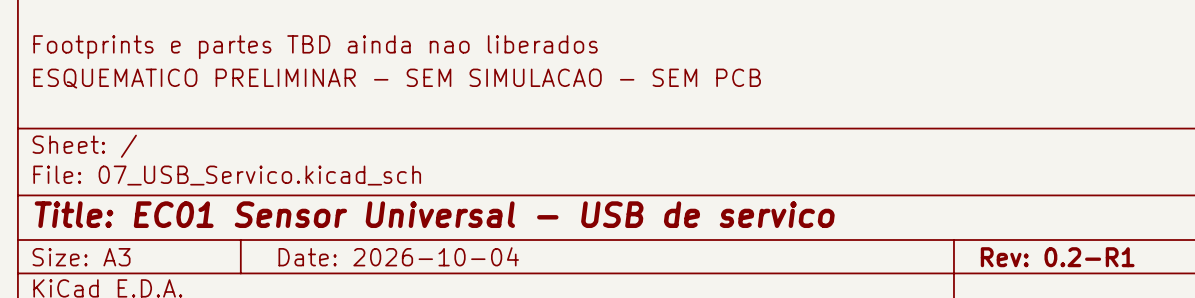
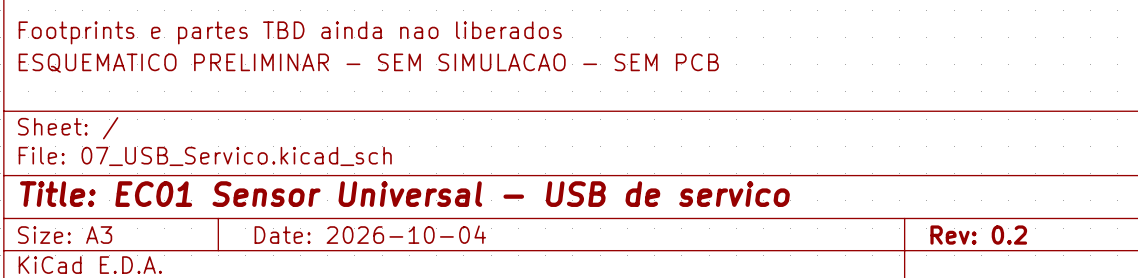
title block: Rev: 0.2-R1 (1057, 257) -> Rev: 0.2 (978, 235)

